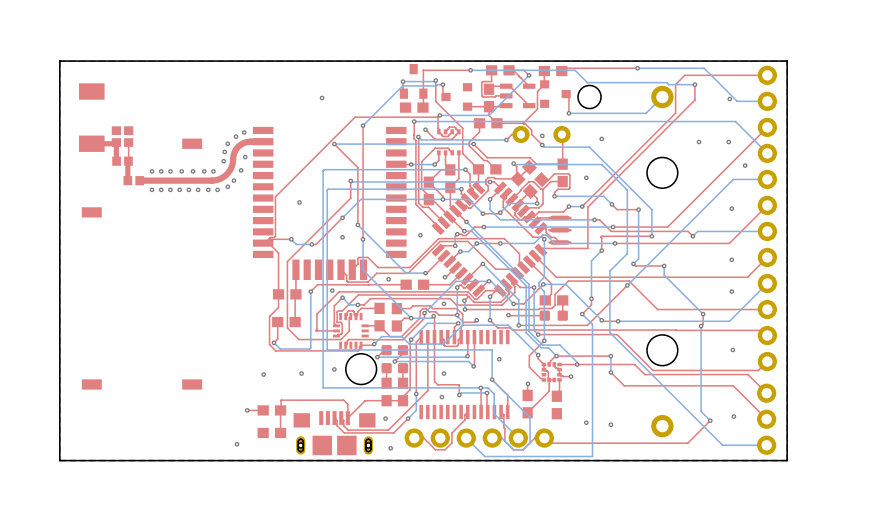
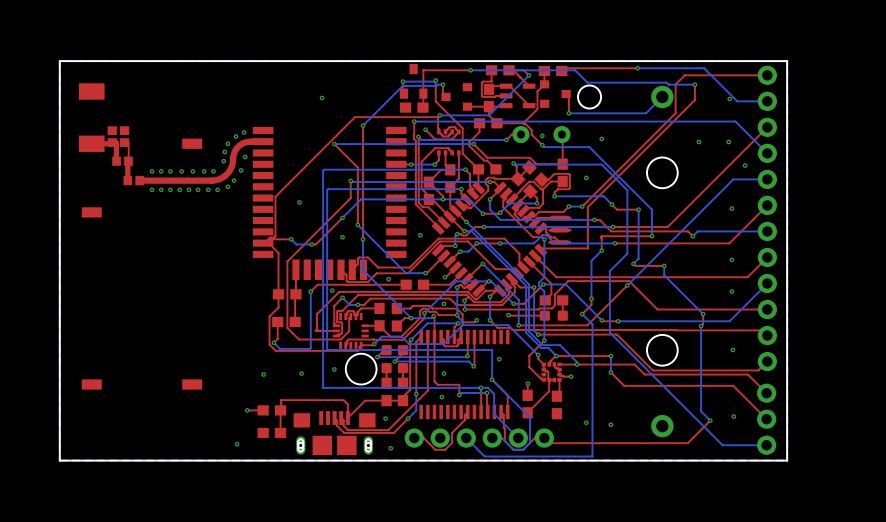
part: none -> (112, 136)
part: (116, 136) -> none
part: none -> (124, 136)
part: (128, 136) -> none

